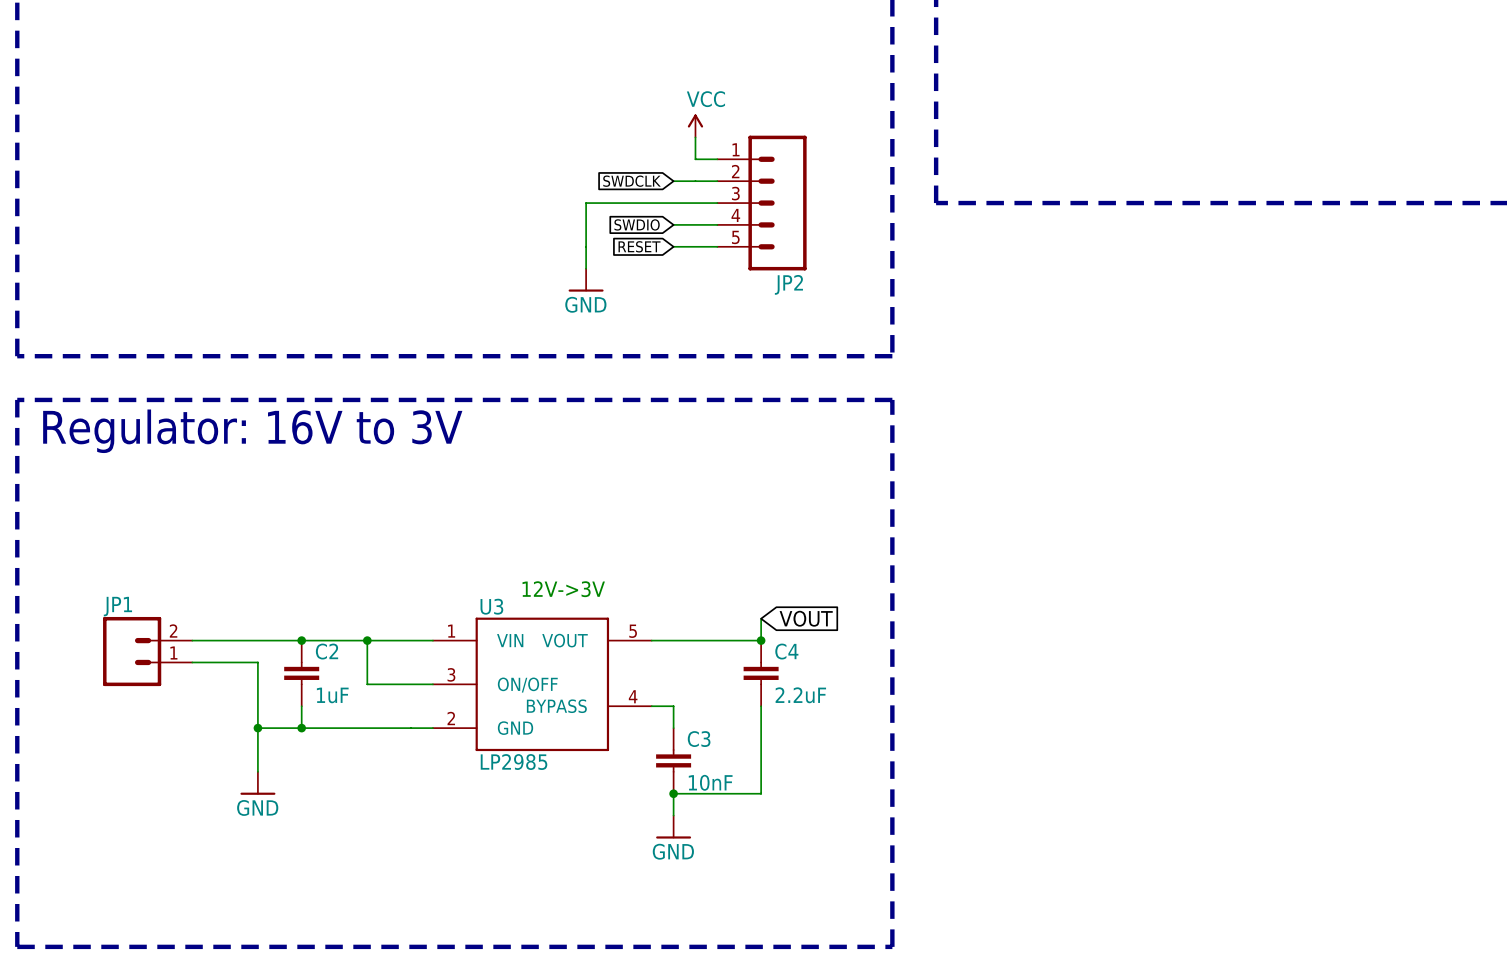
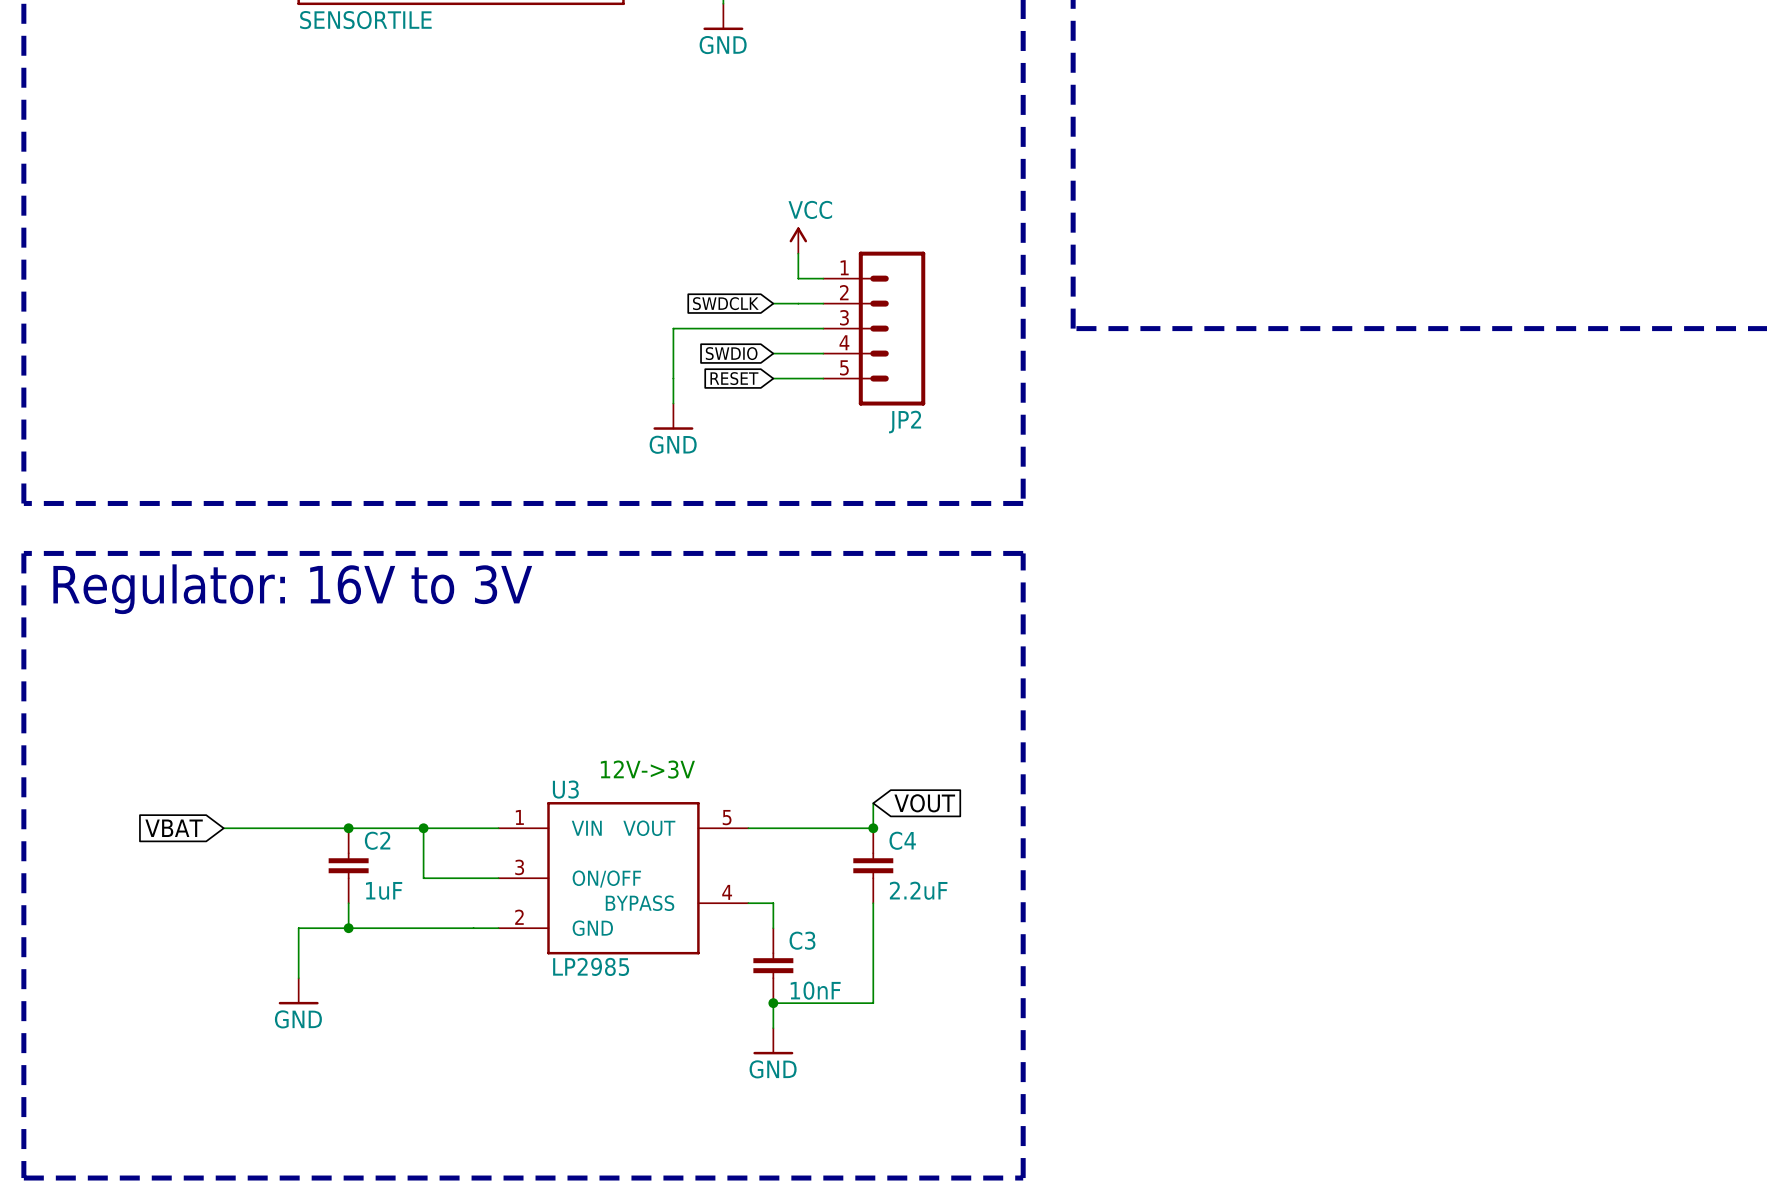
global label: none -> VBAT (174, 828)
JP1: (147, 651) -> none
wire: (192, 662) (257, 662) (257, 728) -> none
junction: (257, 728) -> none

